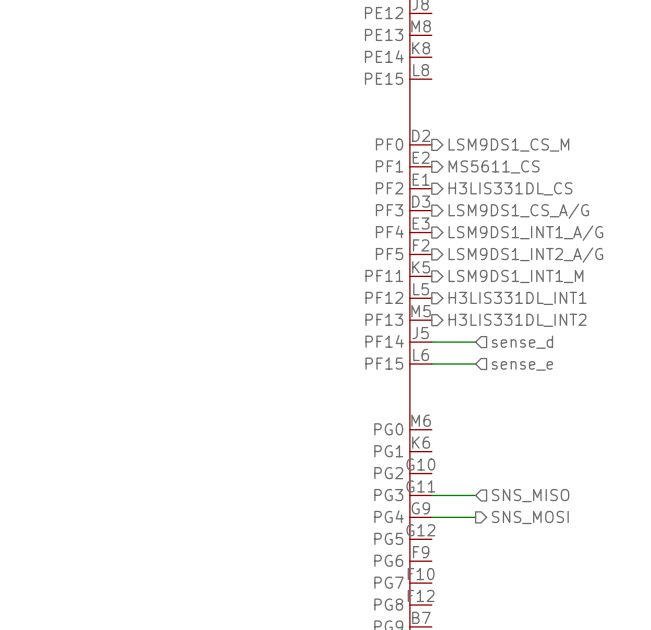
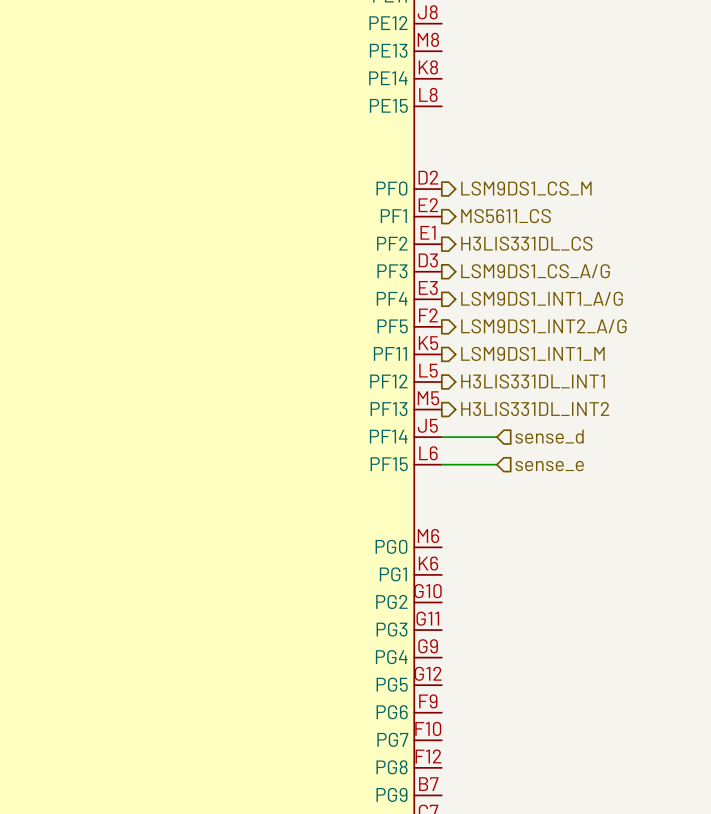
wire: (431, 495) (475, 495) -> none
hierarchical label: SNS_MISO (530, 495) -> none
wire: (431, 517) (475, 517) -> none
hierarchical label: SNS_MOSI (530, 517) -> none

